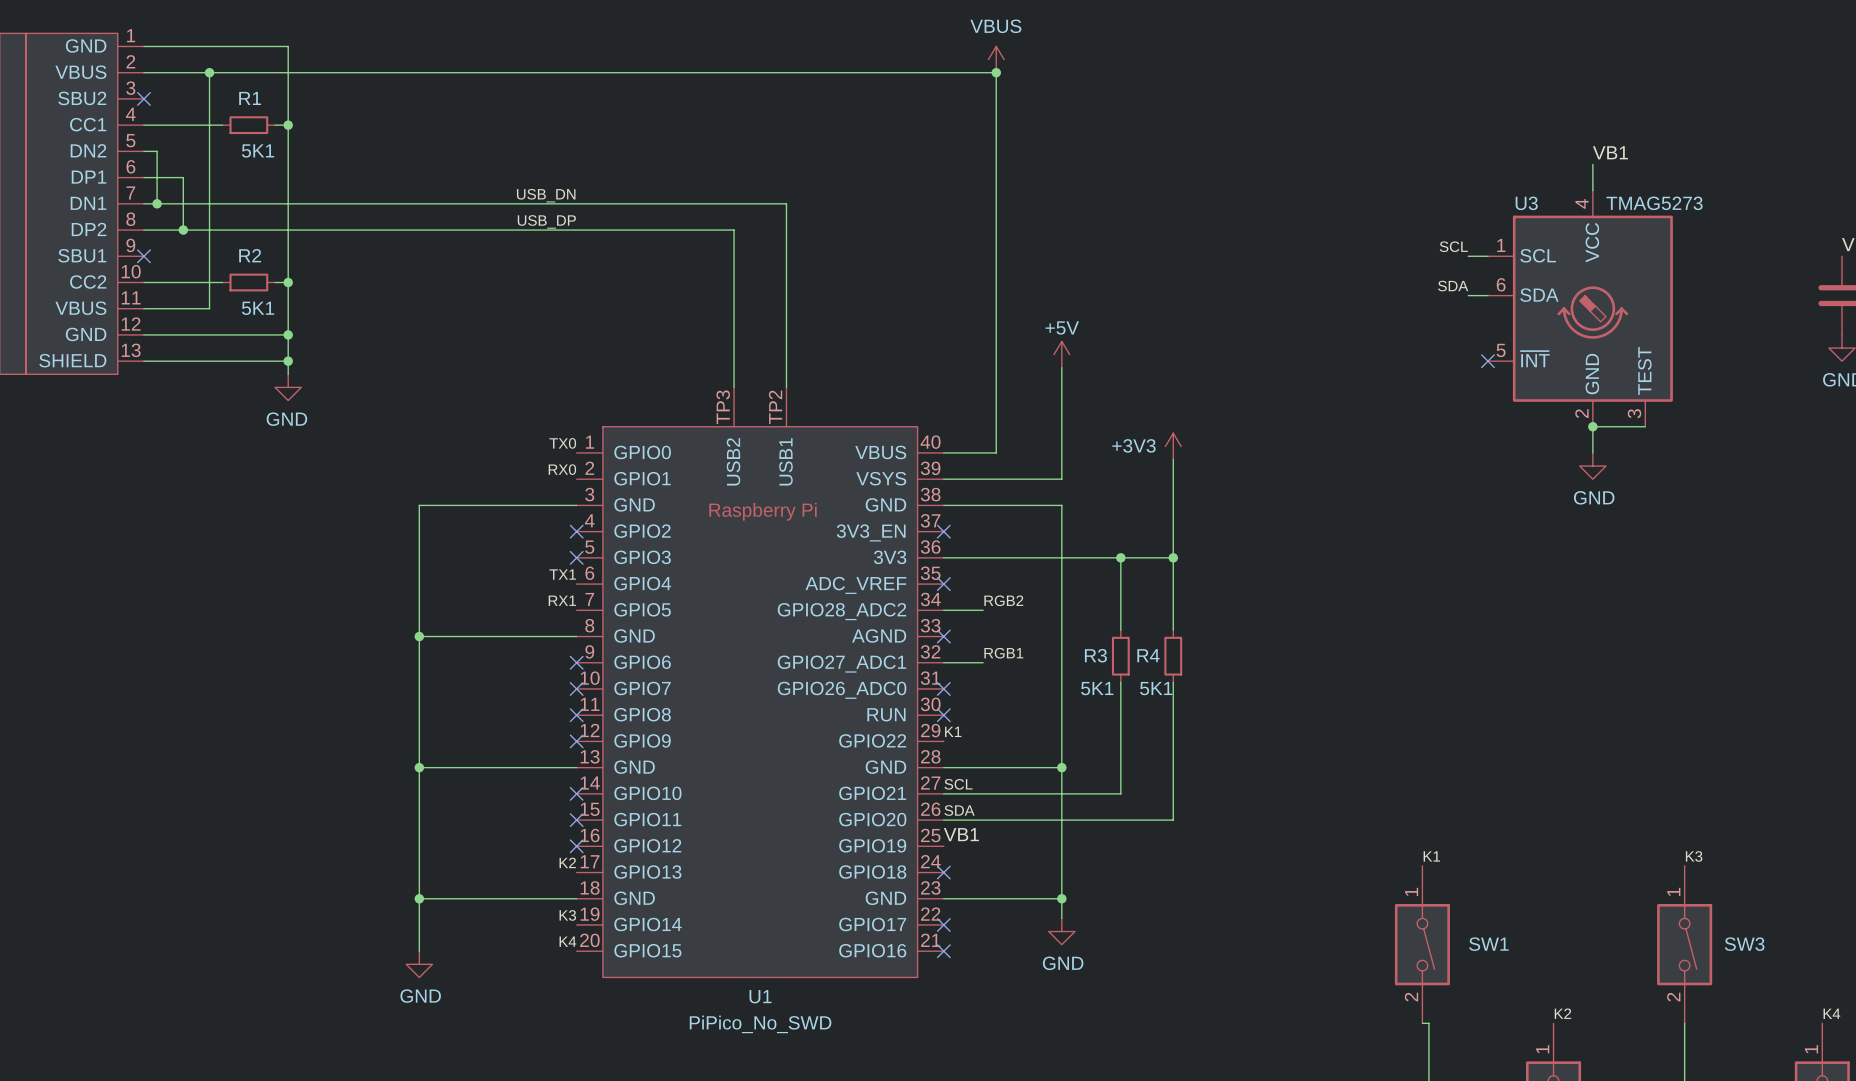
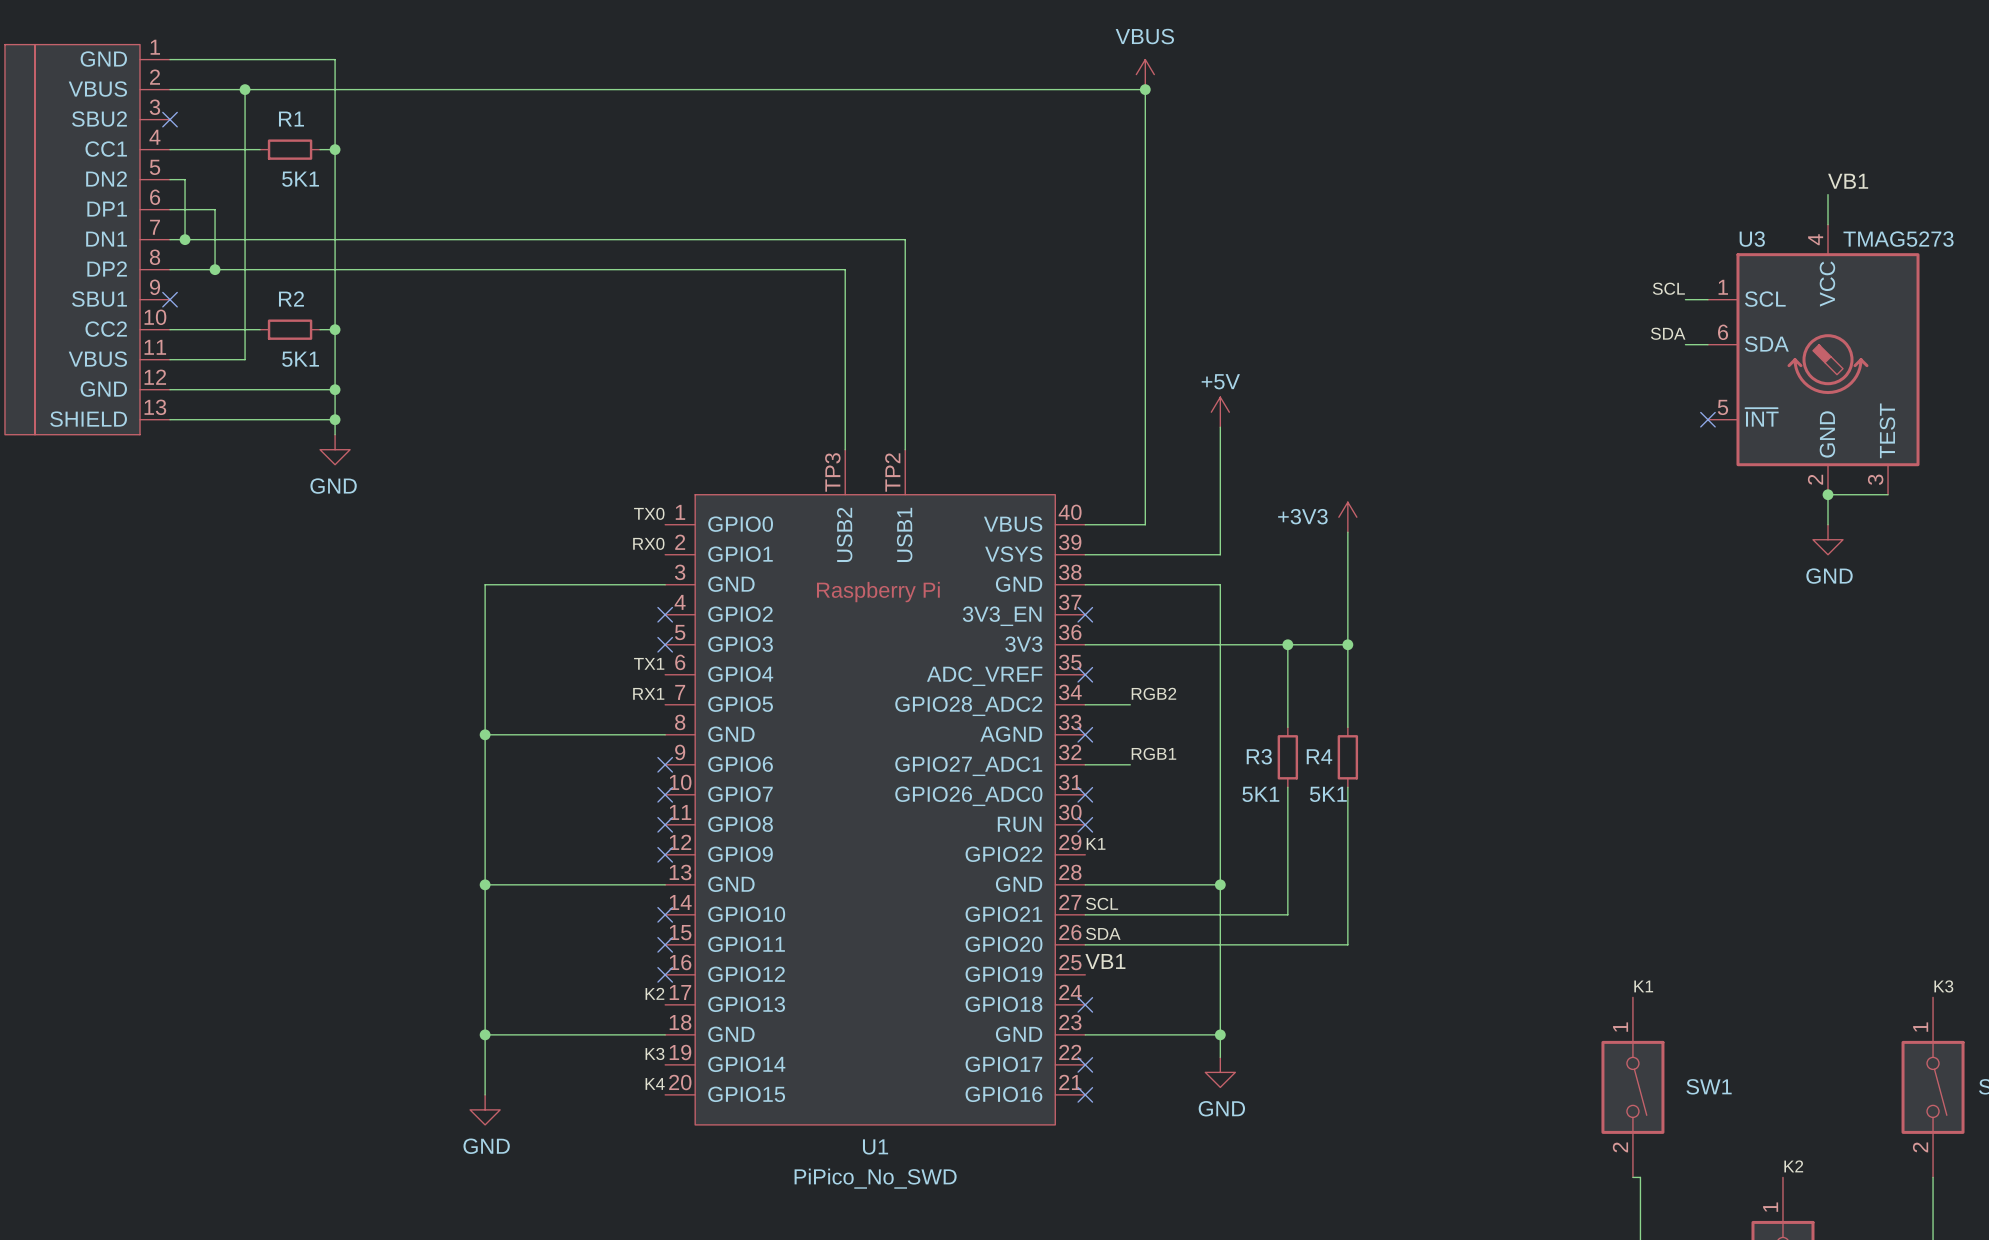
label: USB_DN (546, 195) -> none
label: USB_DP (546, 221) -> none

